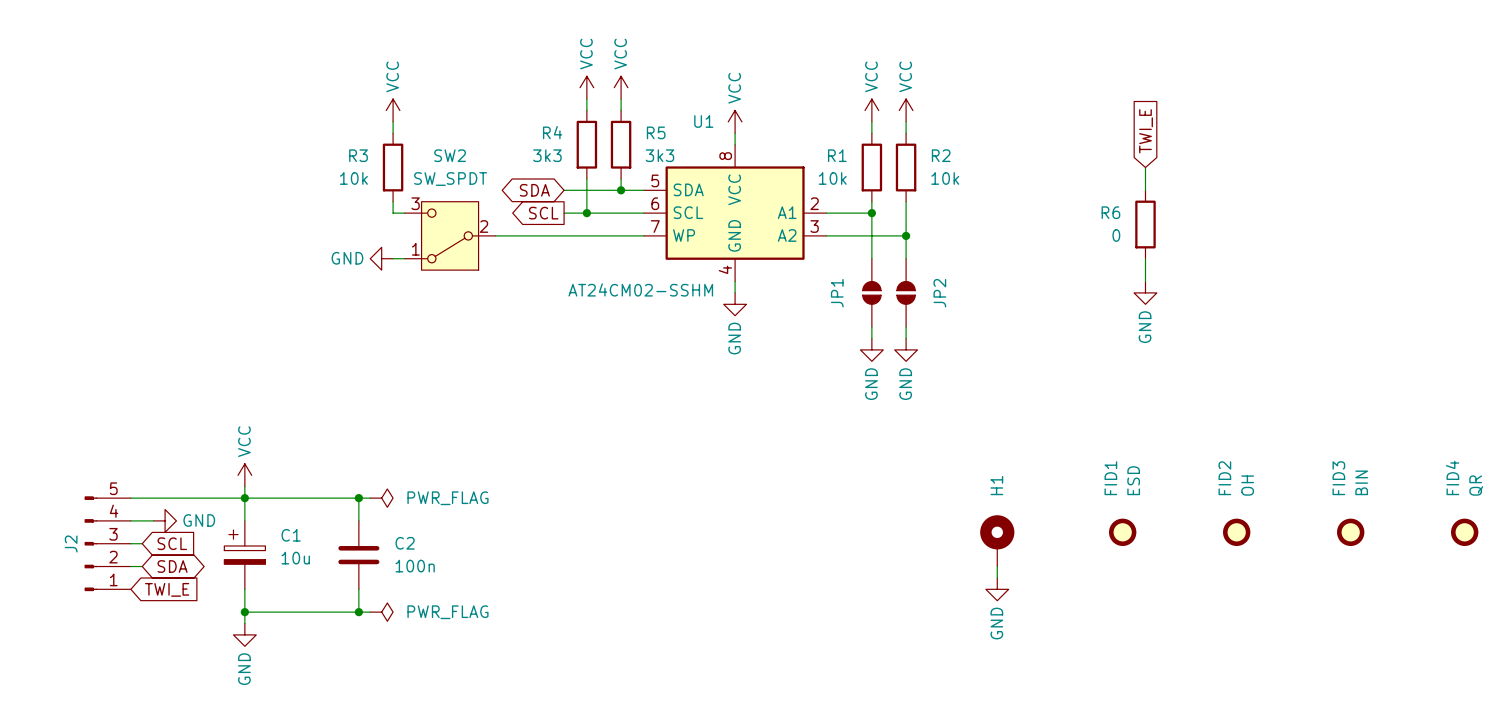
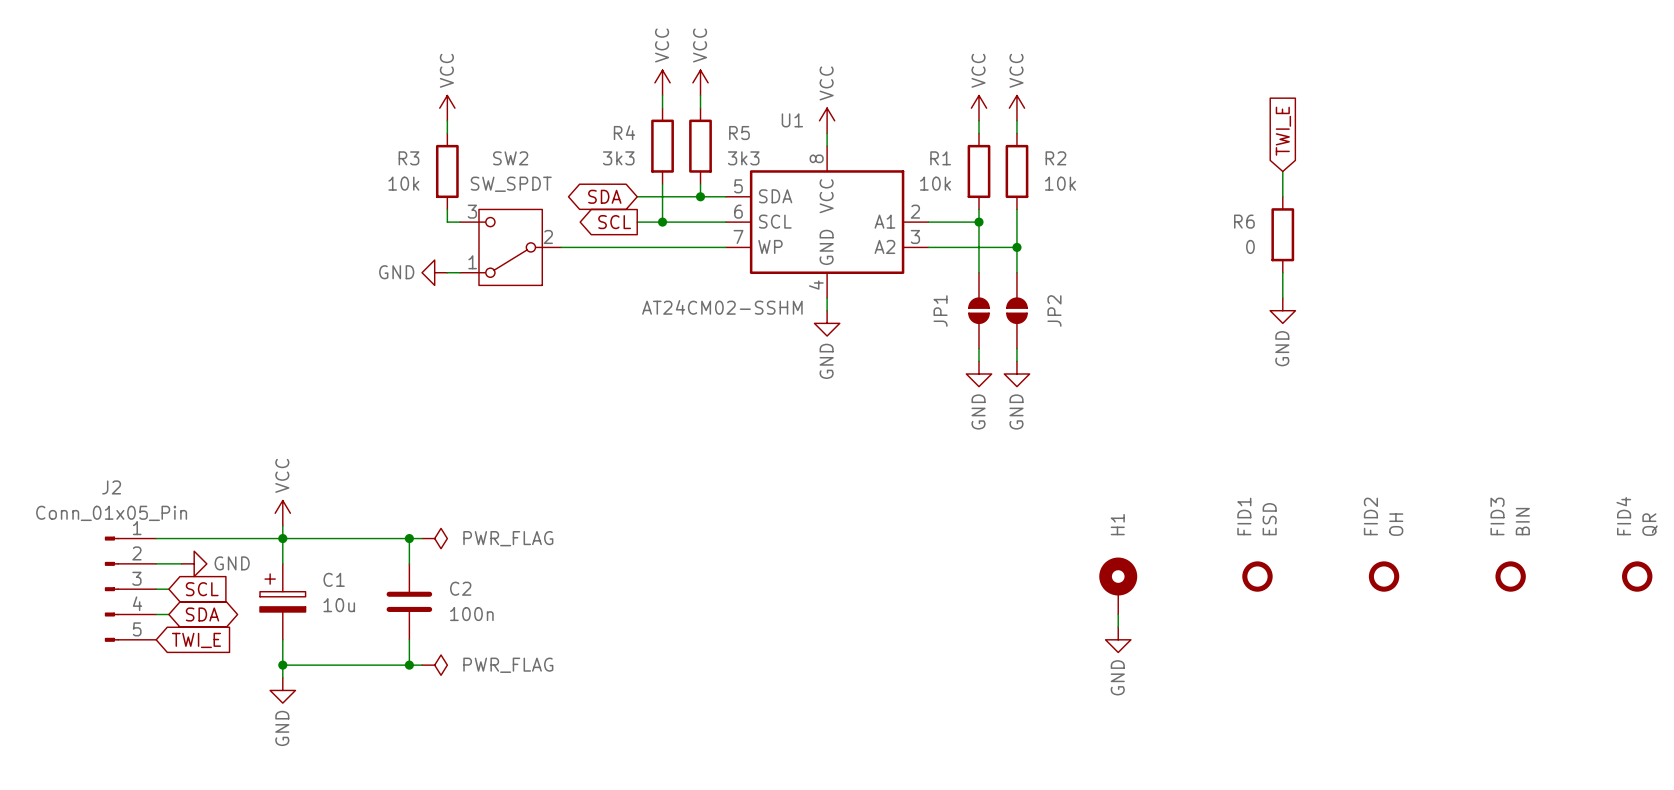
J2 value: none -> Conn_01x05_Pin (111, 513)
J2 name position: J2 (71, 543) -> J2 (111, 487)
J2 flip: as is (90, 543) -> up-down (111, 589)

